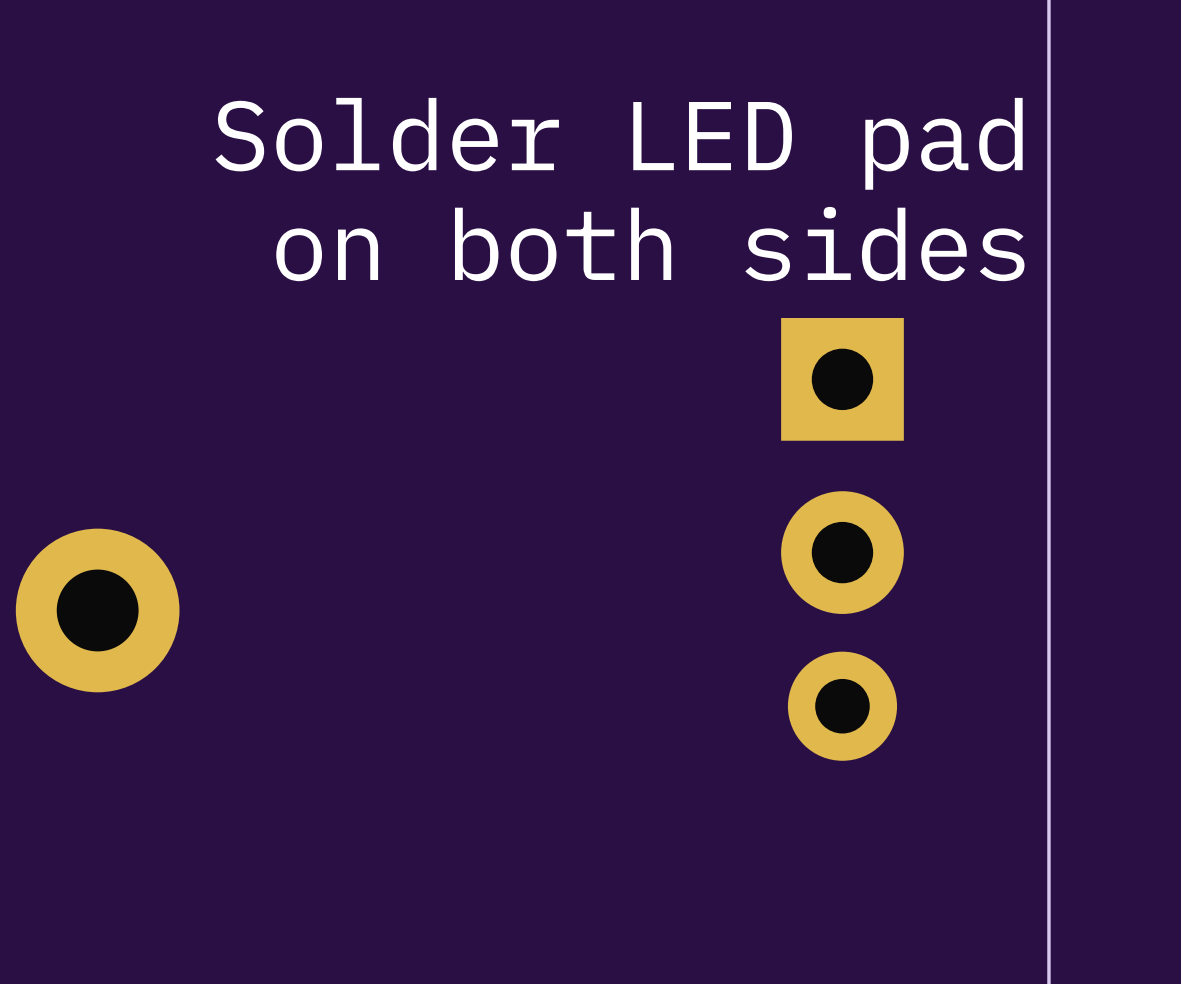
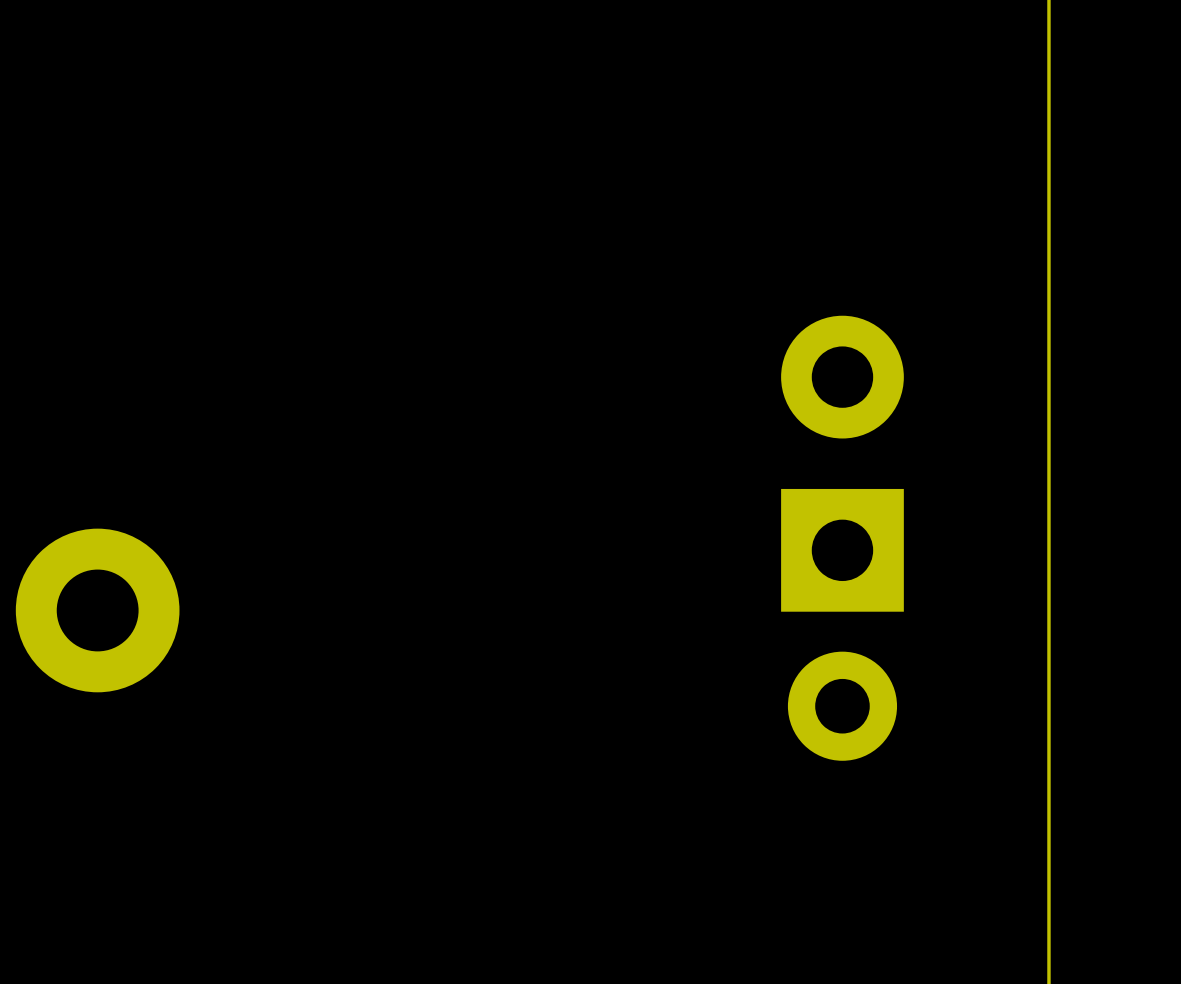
text: Solder LED pad (619, 143) -> none
text: on both sides (650, 244) -> none
part rotation: 0° (842, 465) -> 180° (842, 463)

